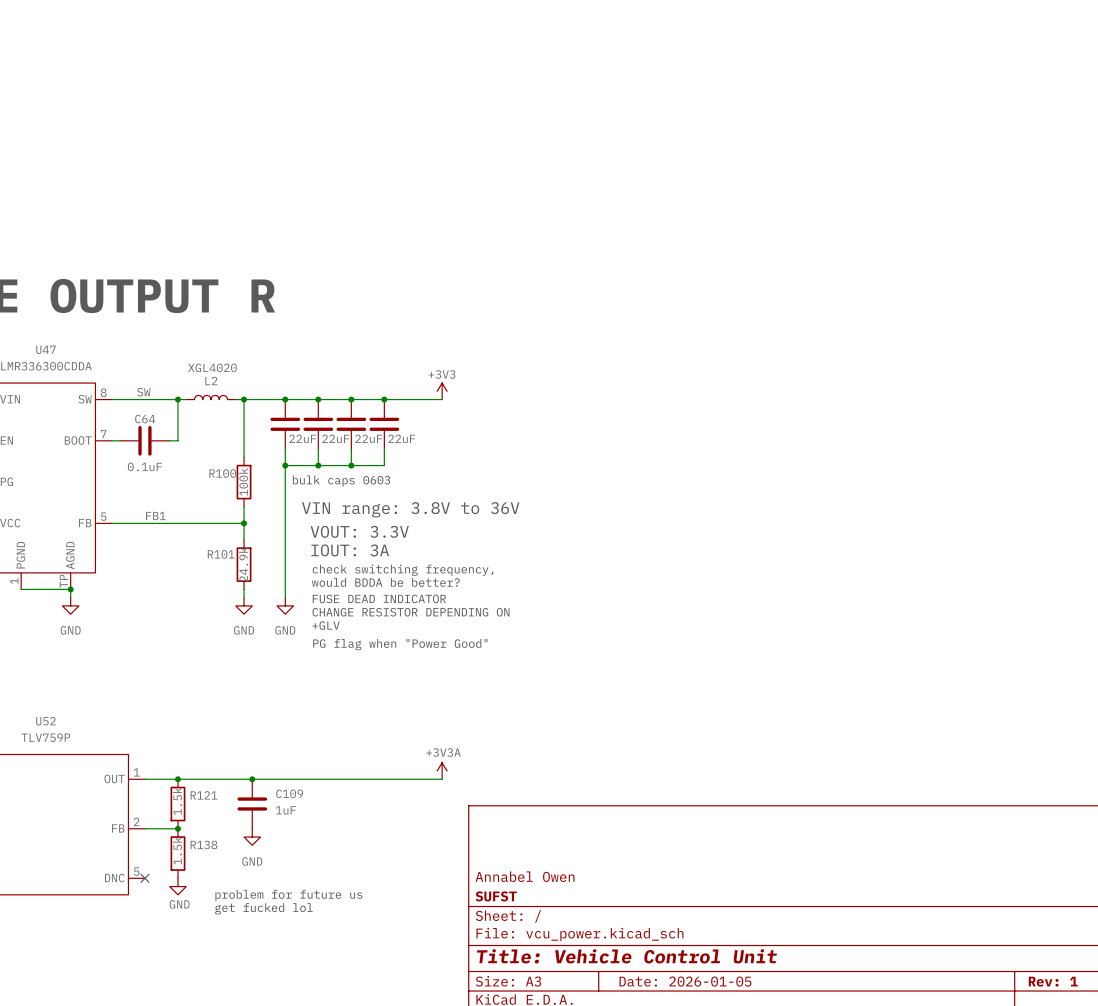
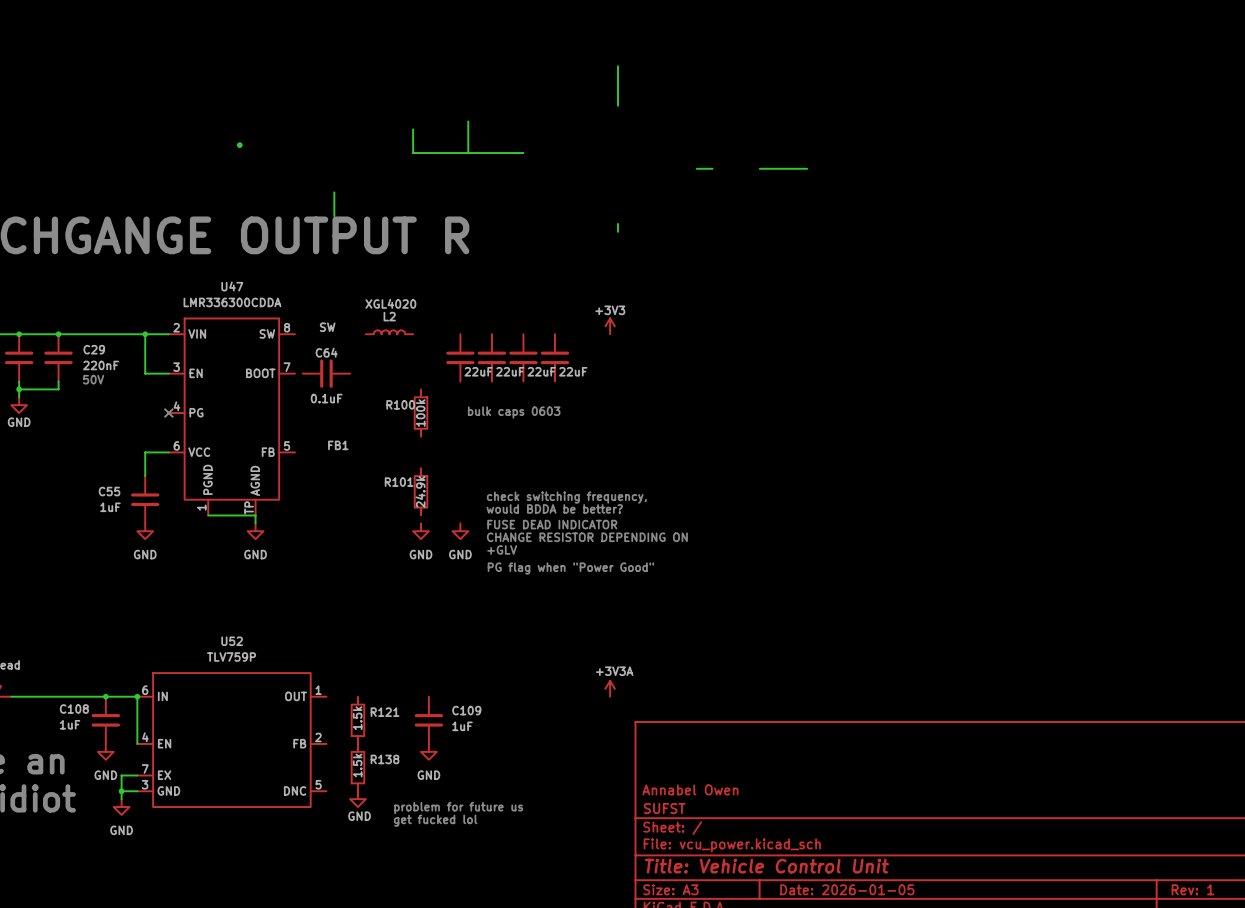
wire: none -> (618, 66) (618, 105)
wire: none -> (468, 121) (468, 153)
wire: none -> (413, 129) (413, 153) (523, 153)
junction: none -> (239, 145)
wire: none -> (696, 168) (712, 168)
wire: none -> (759, 168) (807, 168)
wire: none -> (334, 192) (334, 216)
wire: none -> (618, 223) (618, 231)
wire: (111, 399) (186, 399) -> none
wire: (177, 399) (177, 440) (169, 440) -> none
junction: (177, 399) -> none
wire: (235, 399) (442, 399) -> none
wire: (244, 399) (244, 457) -> none
junction: (244, 399) -> none
junction: (285, 399) -> none
junction: (318, 399) -> none
junction: (351, 399) -> none
junction: (384, 399) -> none
wire: (111, 440) (120, 440) -> none
wire: (285, 449) (285, 597) -> none
wire: (318, 449) (318, 465) -> none
wire: (351, 449) (351, 465) -> none
wire: (384, 449) (384, 465) (285, 465) -> none
junction: (285, 465) -> none
junction: (318, 465) -> none
junction: (351, 465) -> none
wire: (244, 506) (244, 539) -> none
text: VIN range: 3.8V to 36V (410, 509) -> none
wire: (111, 523) (244, 523) -> none
junction: (244, 523) -> none
text: VOUT: 3.3V (359, 531) -> none
text: IOUT: 3A (350, 550) -> none
junction: (70, 589) -> none
wire: (244, 589) (244, 597) -> none
wire: (144, 779) (442, 779) -> none
junction: (177, 779) -> none
junction: (252, 779) -> none
wire: (144, 828) (177, 828) -> none
junction: (177, 828) -> none
no-connect mark: (144, 878) -> none

